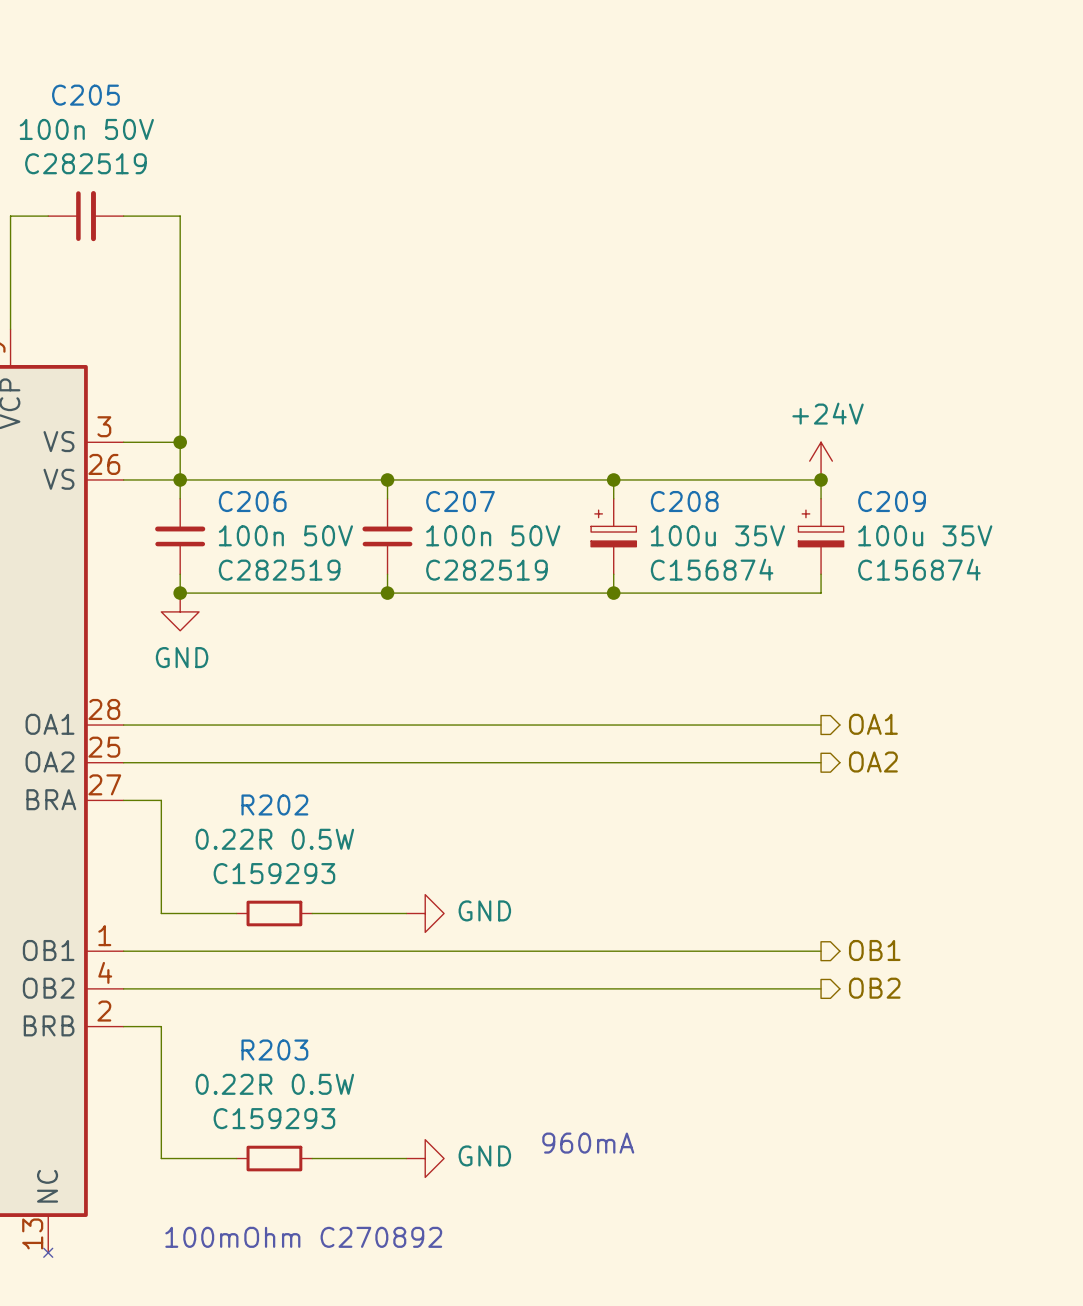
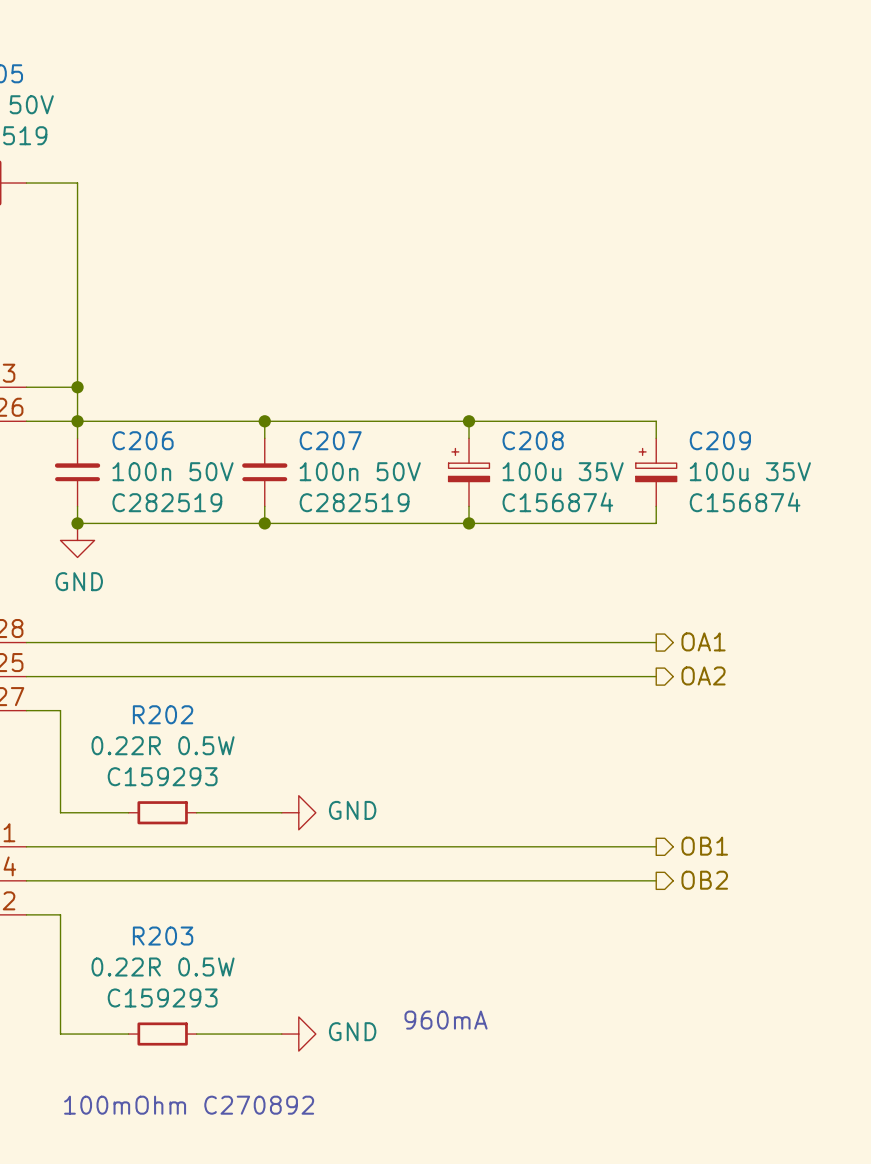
power symbol: +24V (821, 461) -> none
junction: (821, 479) -> none

